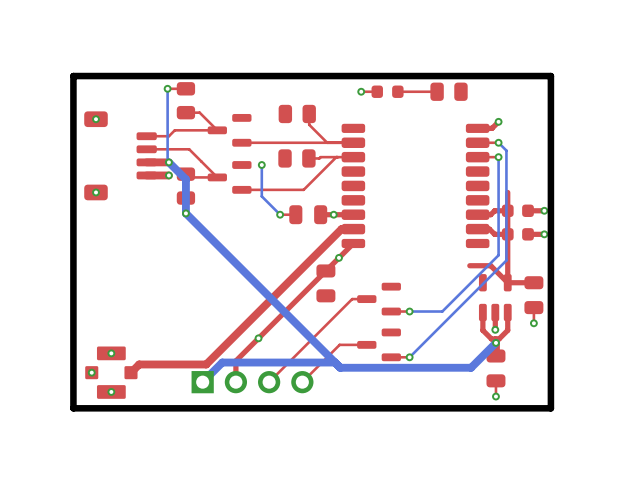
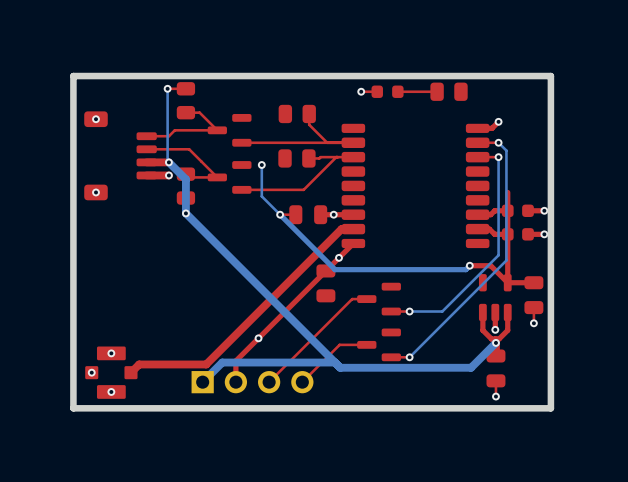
bottom track: none -> (280, 214) (335, 269) (465, 269) (469, 265)
via: none -> (469, 265)

